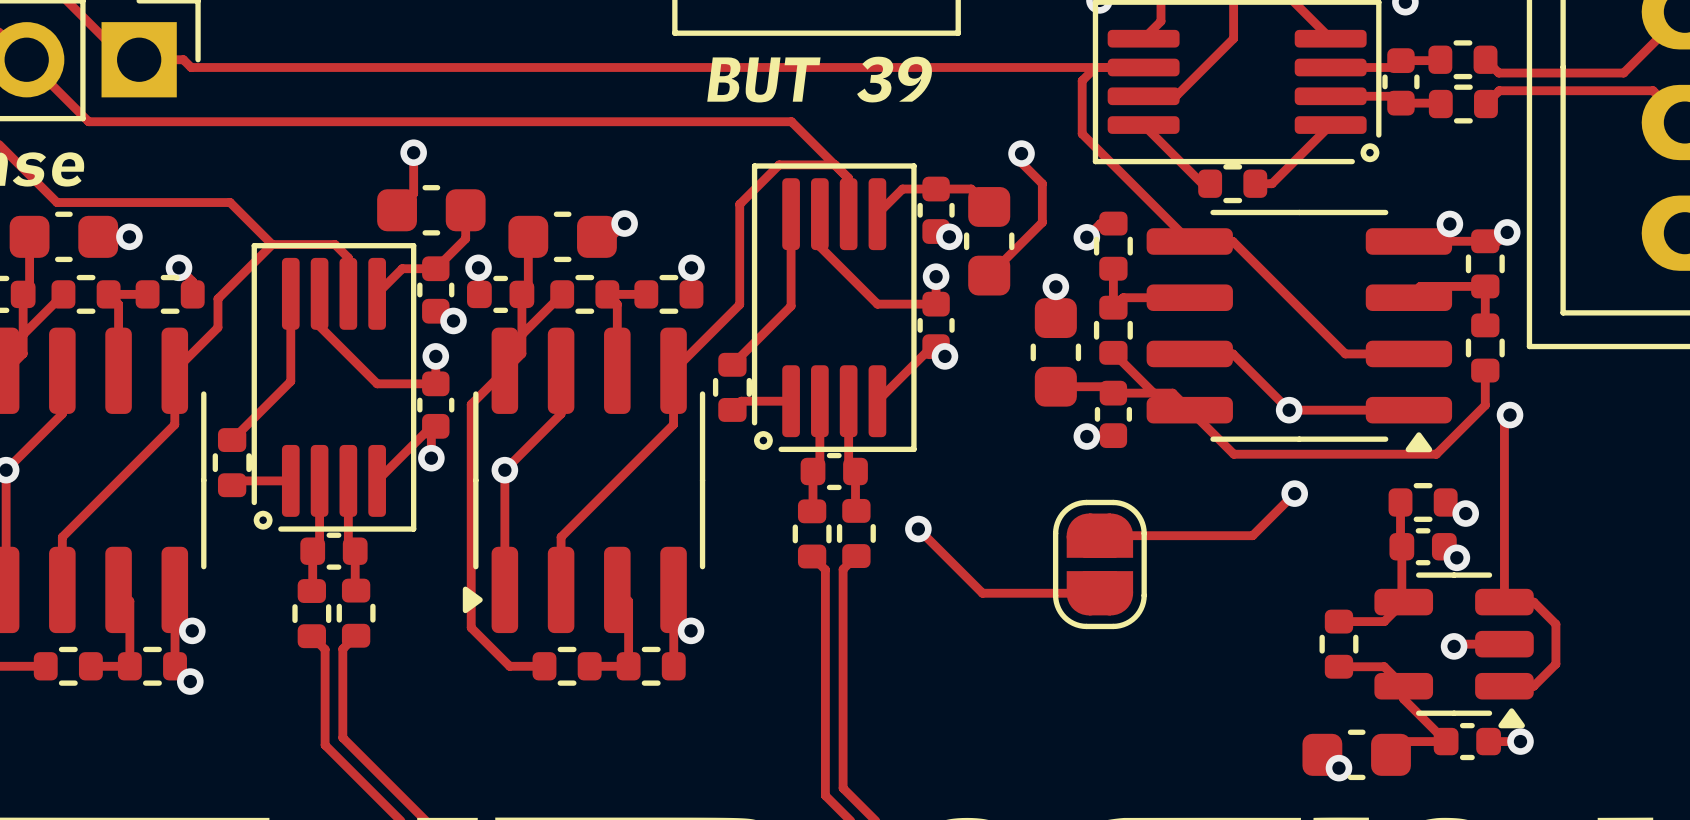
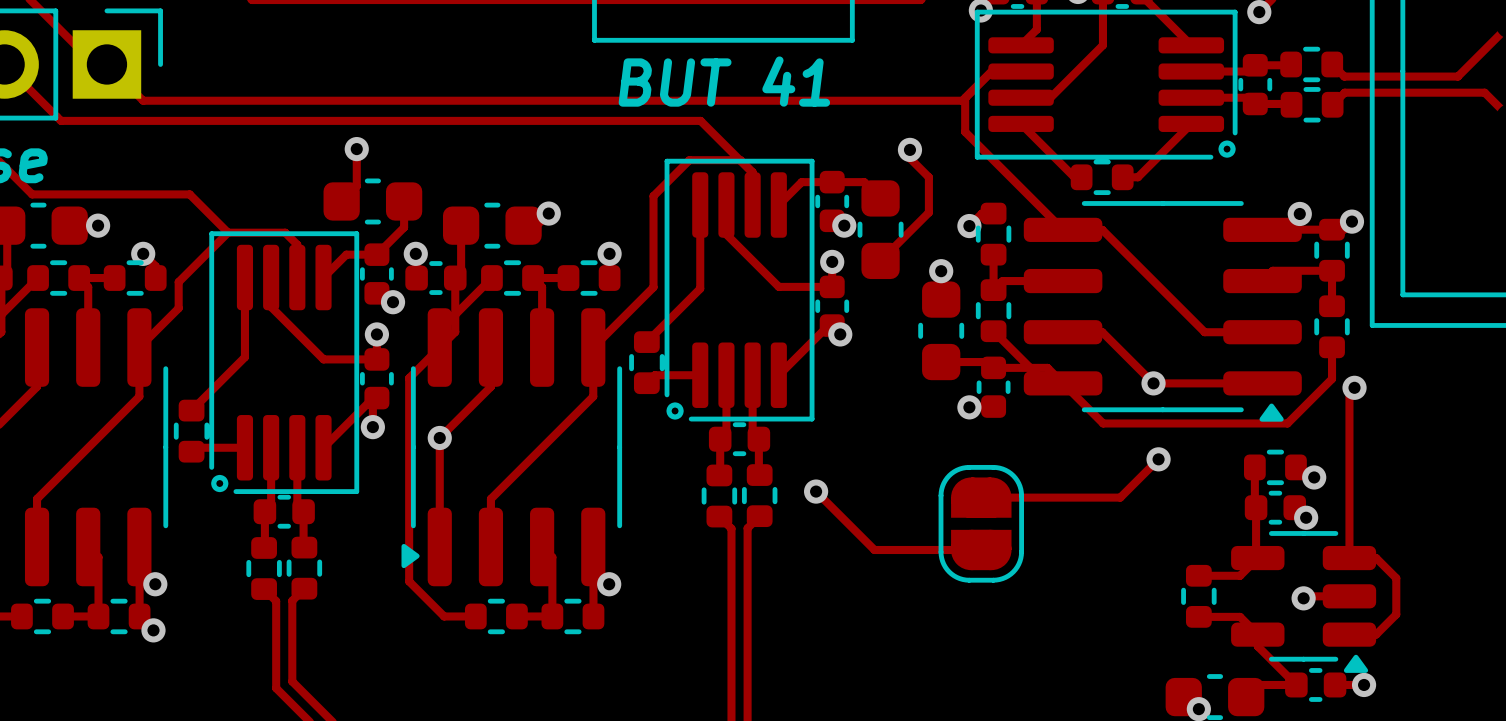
track: (139, 59) (183, 59) (191, 67) (1111, 67) -> (106, 64) (143, 100) (962, 100) (991, 71)
track: (1095, 67) (1082, 80) (1082, 96) -> none
text: BUT 39 (819, 79) -> BUT 41 (724, 81)

